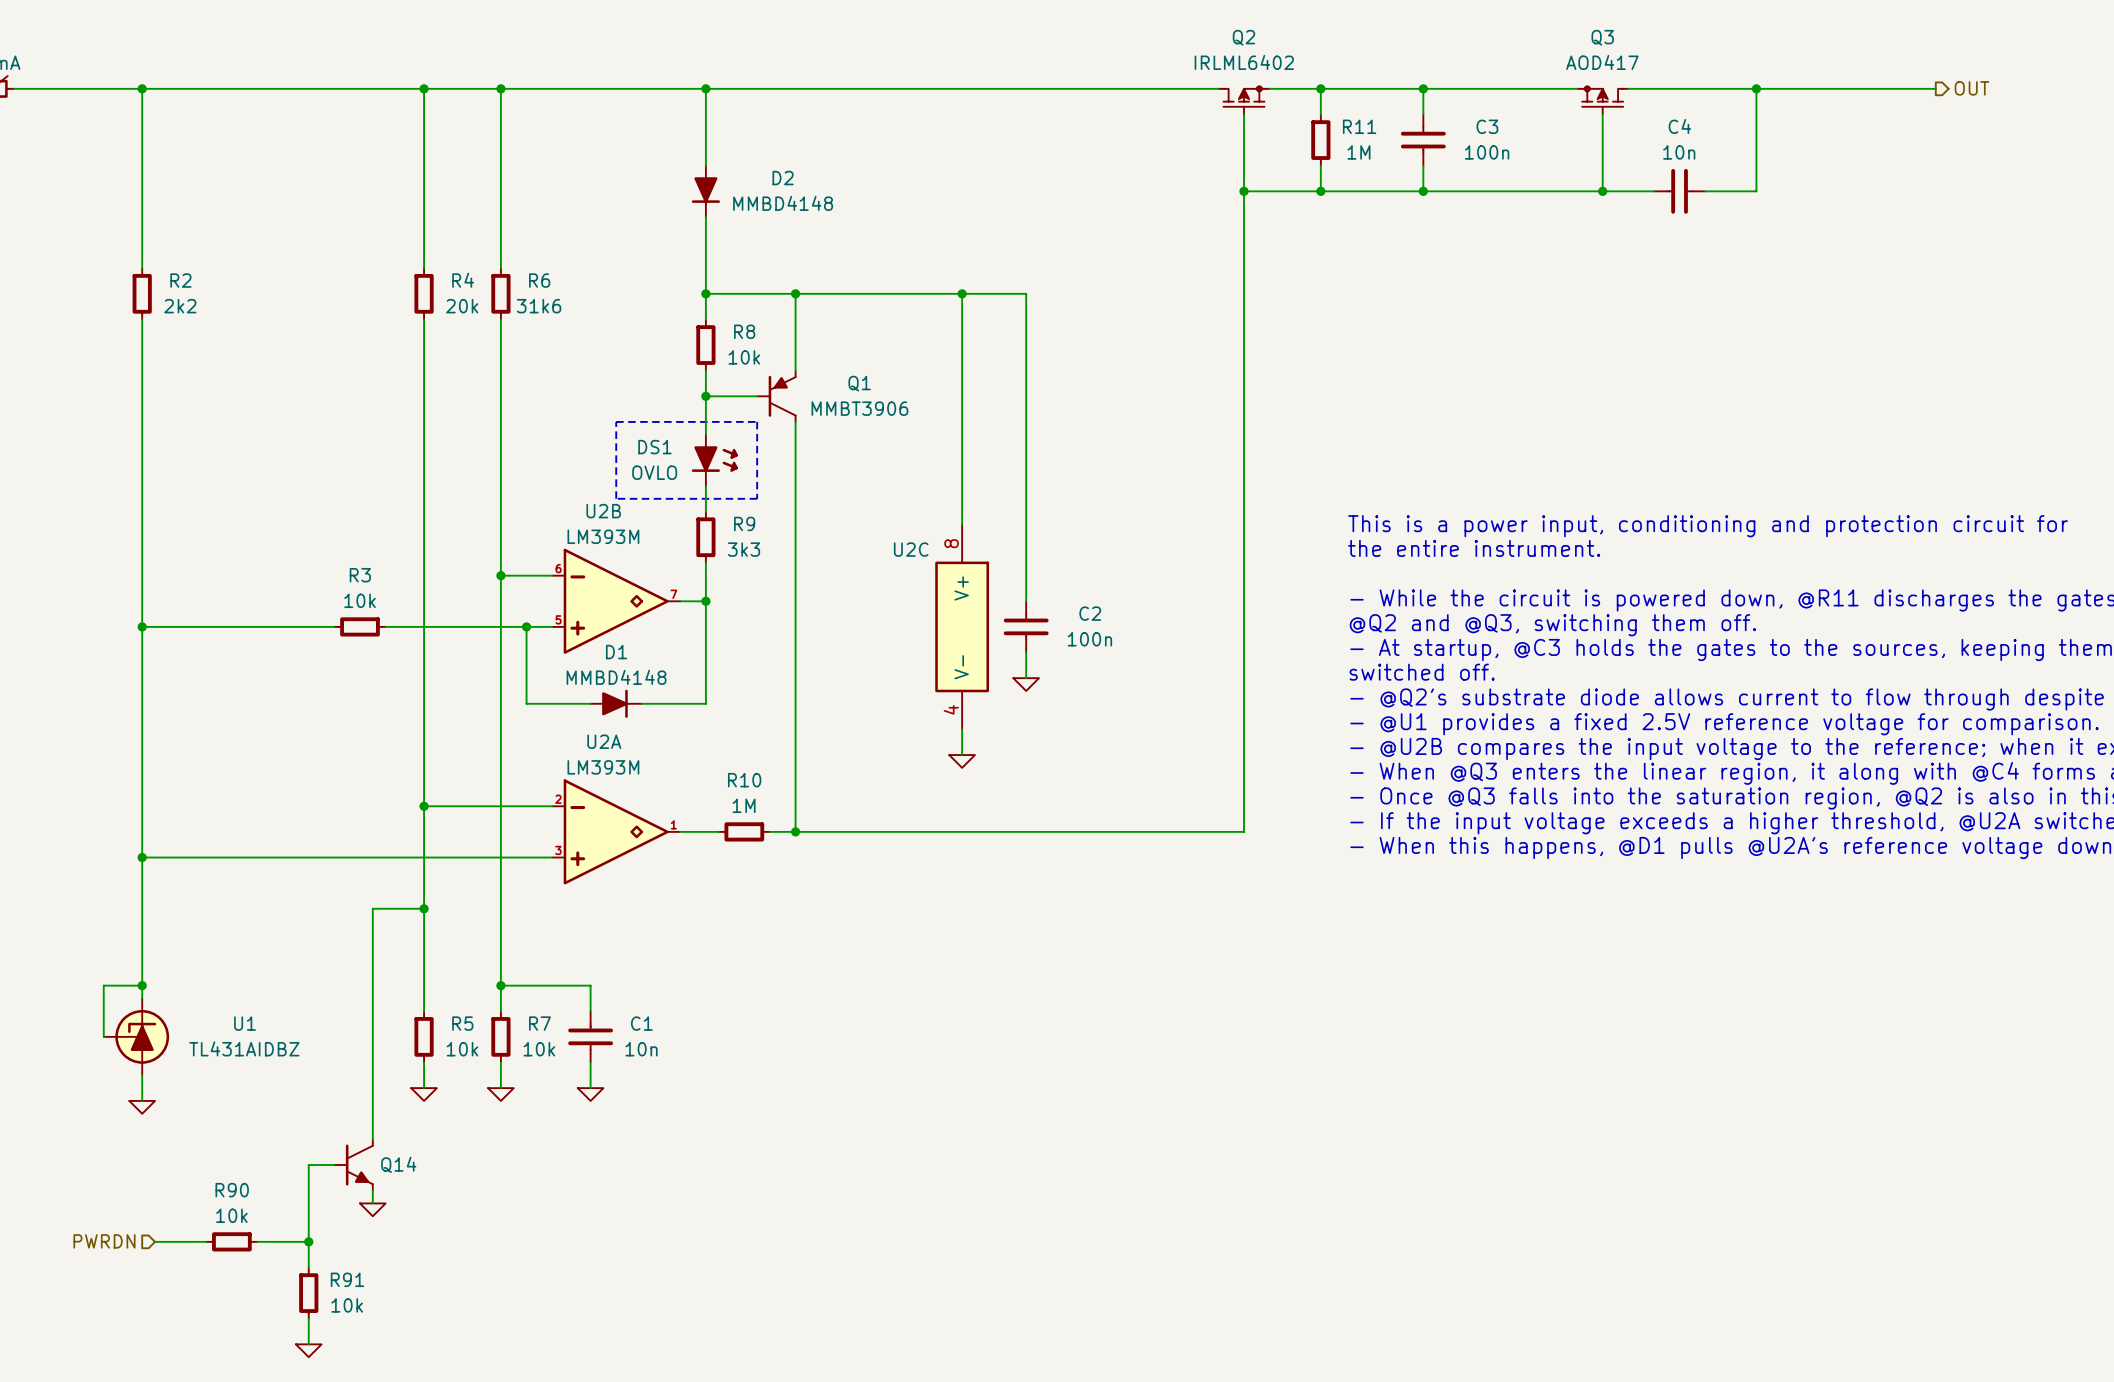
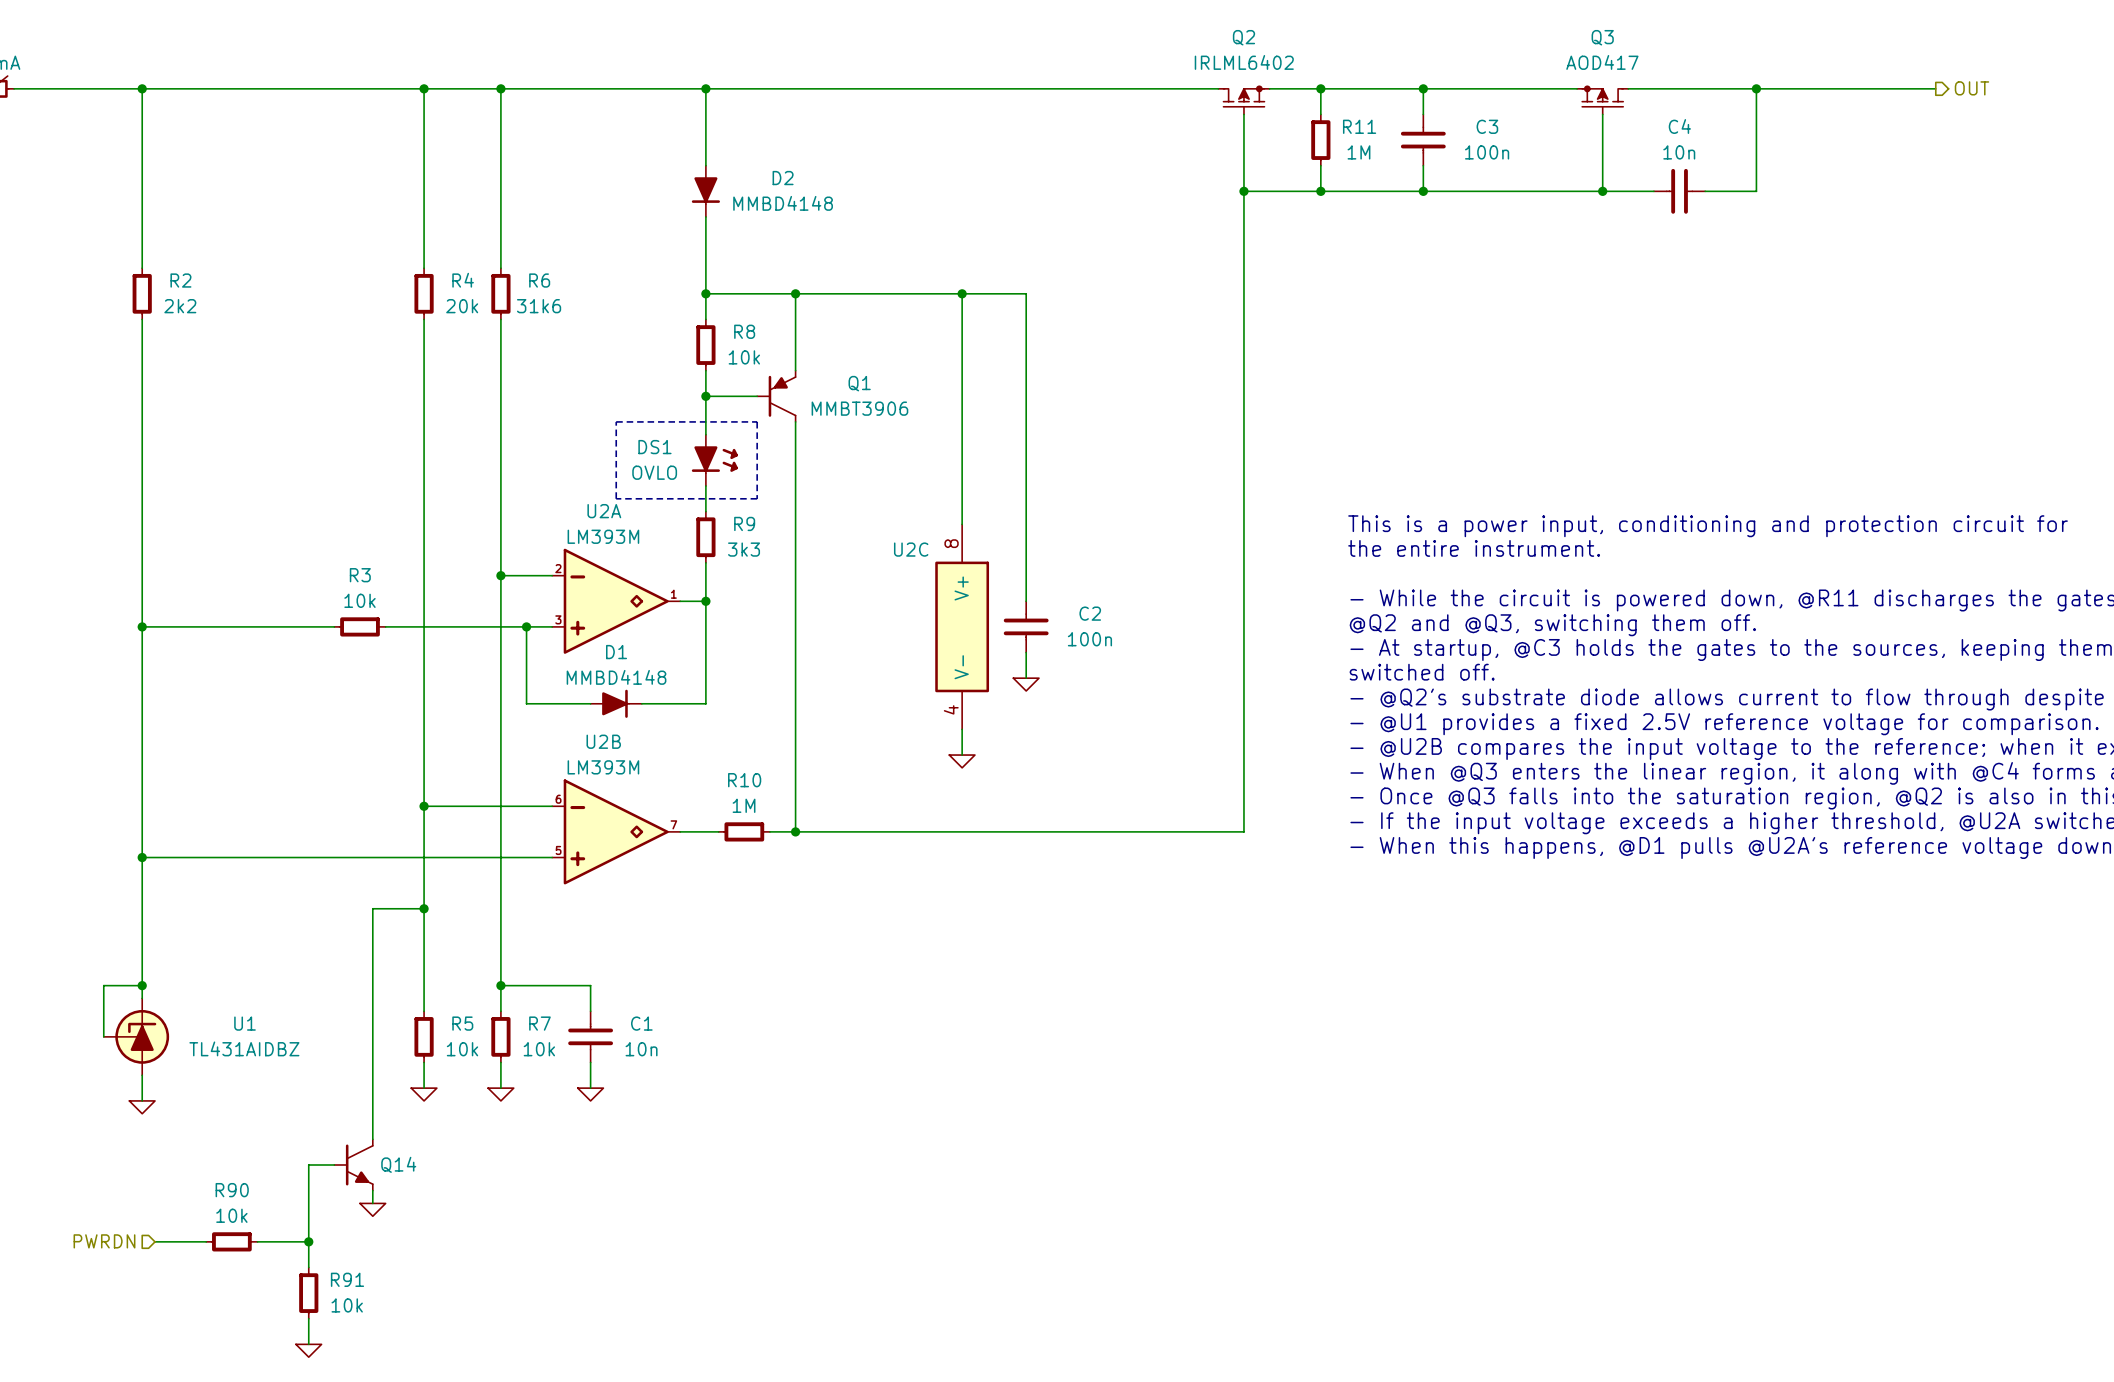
U2B position: (616, 601) -> (616, 831)
U2A position: (616, 831) -> (616, 601)

